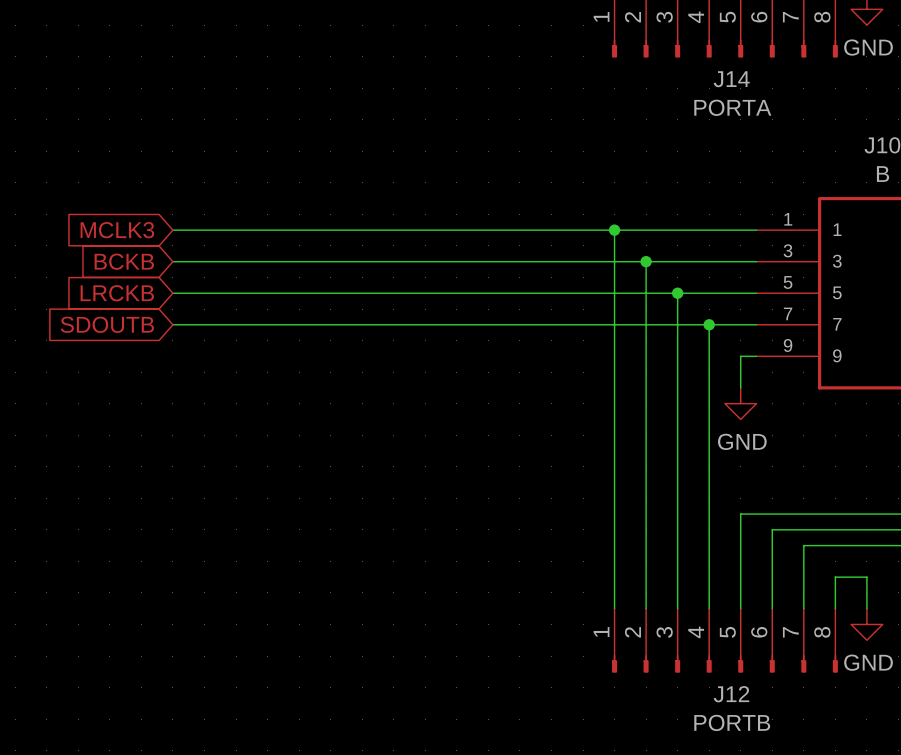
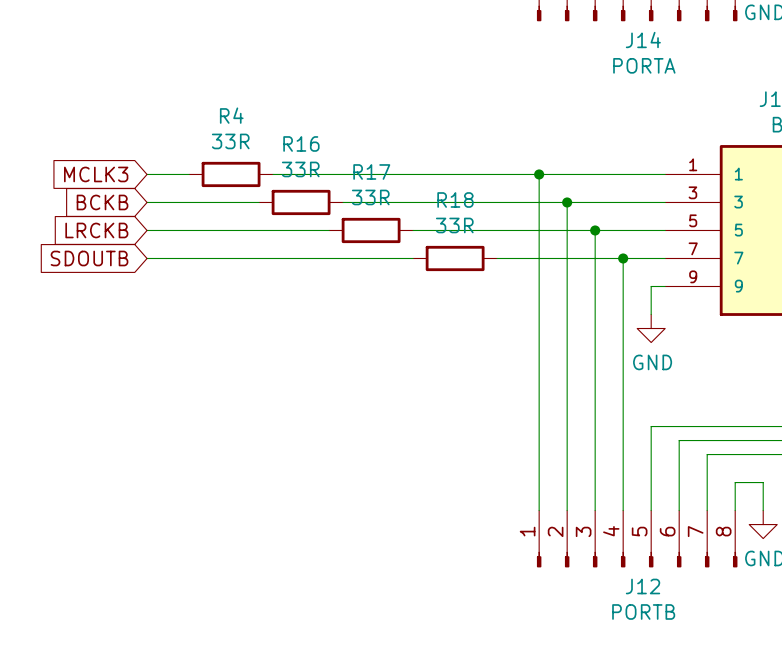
wire: (220, 230) (314, 230) -> none
R4: none -> 33R (231, 174)
wire: (299, 261) (393, 261) -> none
R16: none -> 33R (301, 202)
wire: (377, 293) (472, 293) -> none
R17: none -> 33R (371, 230)
wire: (472, 324) (567, 324) -> none
R18: none -> 33R (455, 258)

